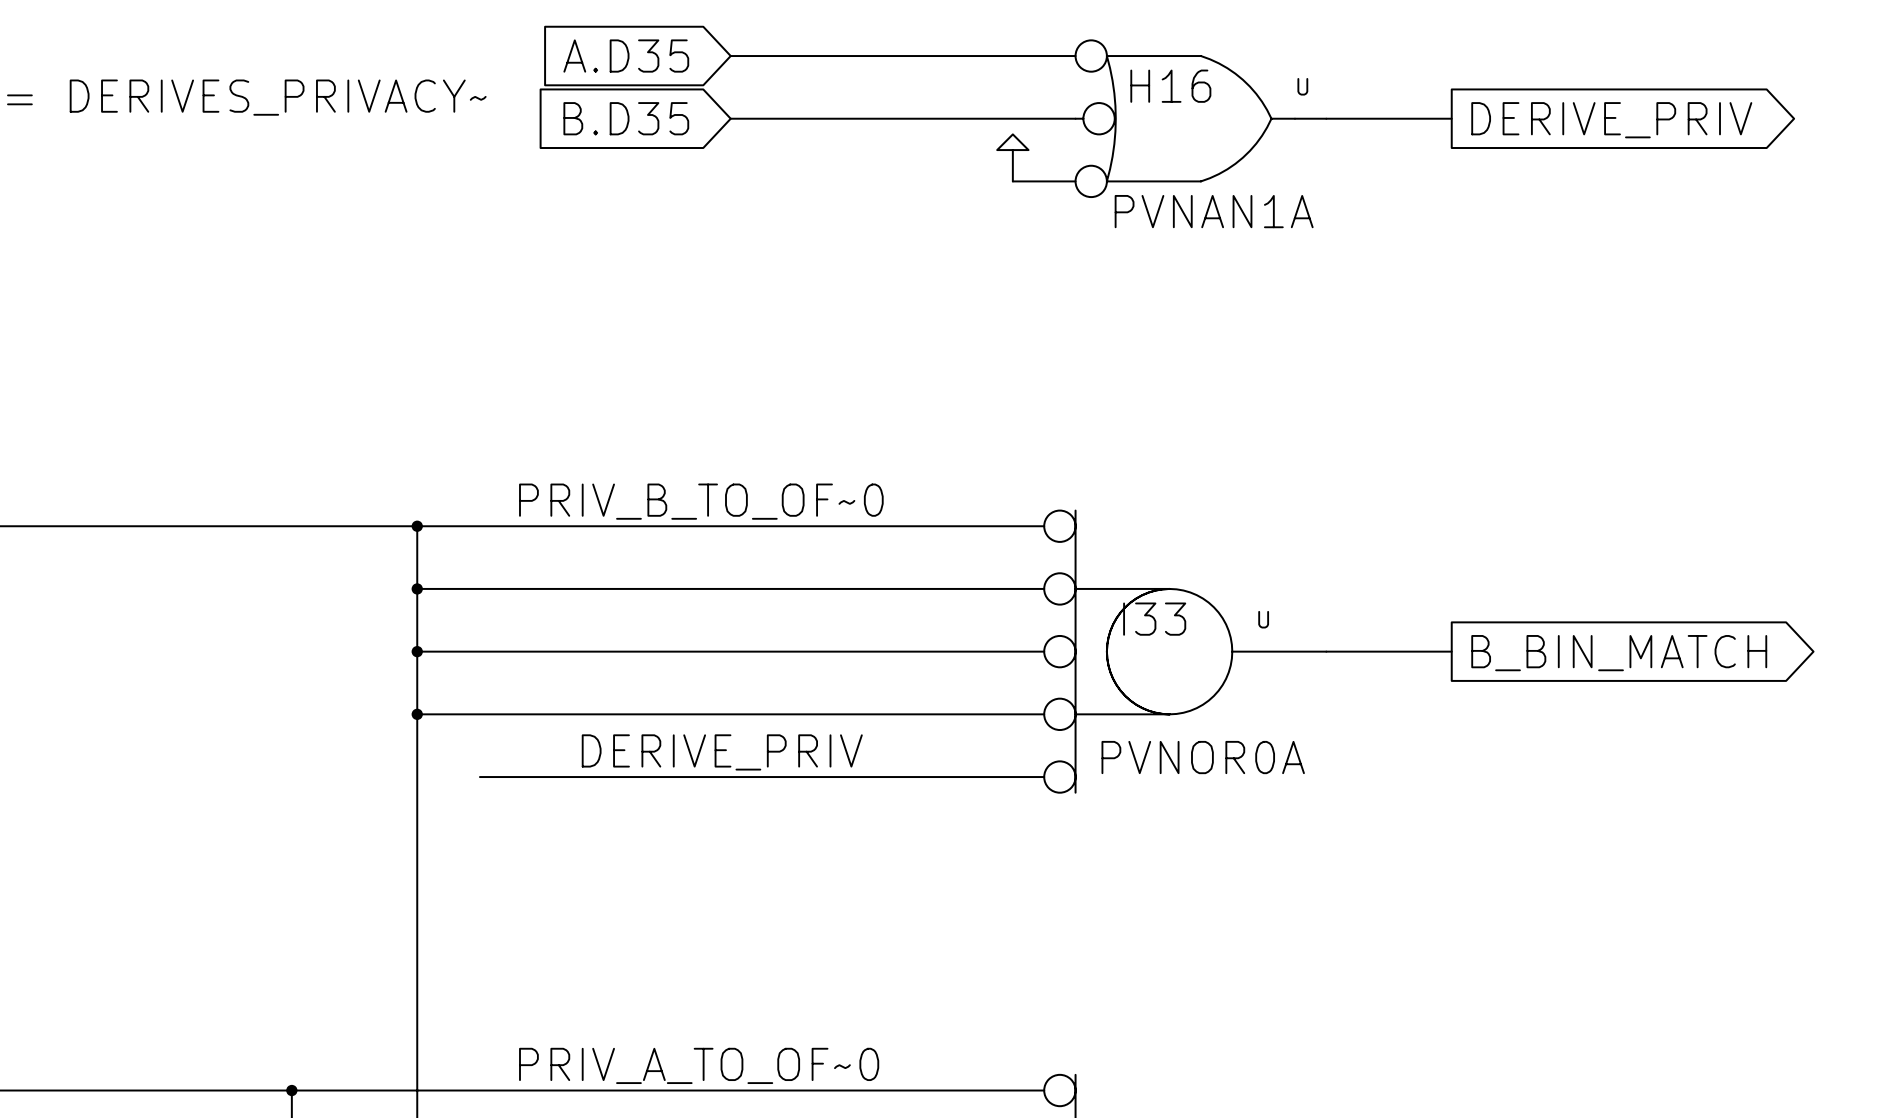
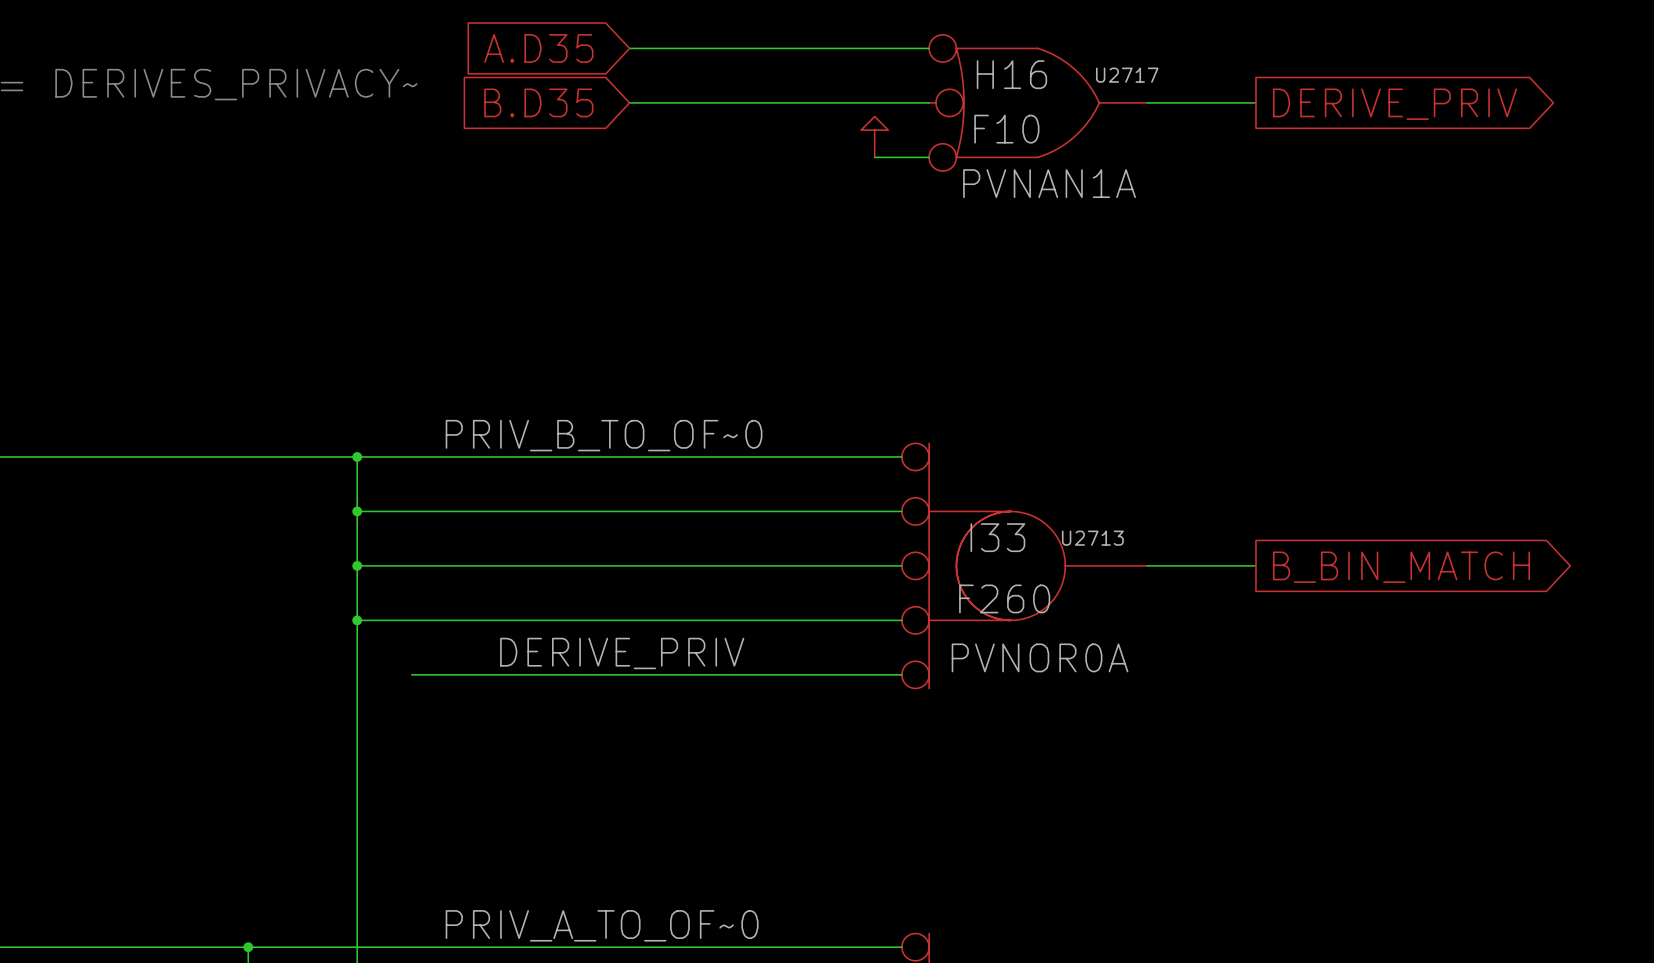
U name: U (1302, 86) -> U2717 (1127, 75)
U value: none -> F10 (1006, 129)
U name: U (1263, 619) -> U2713 (1092, 538)
U value: none -> F260 (1004, 598)

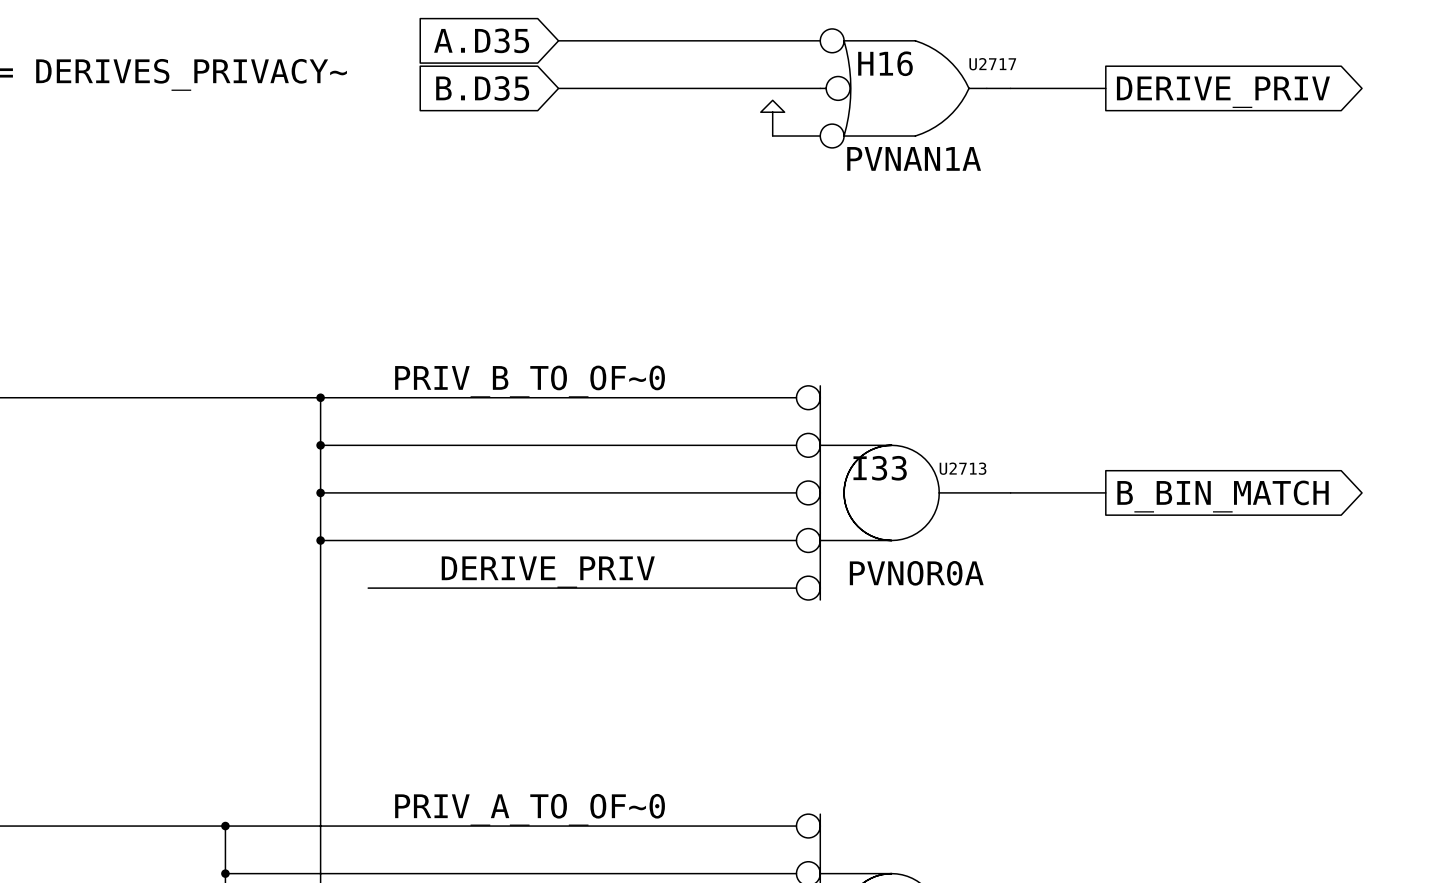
U2717 value: F10 (1006, 129) -> none
U2713 value: F260 (1004, 598) -> none

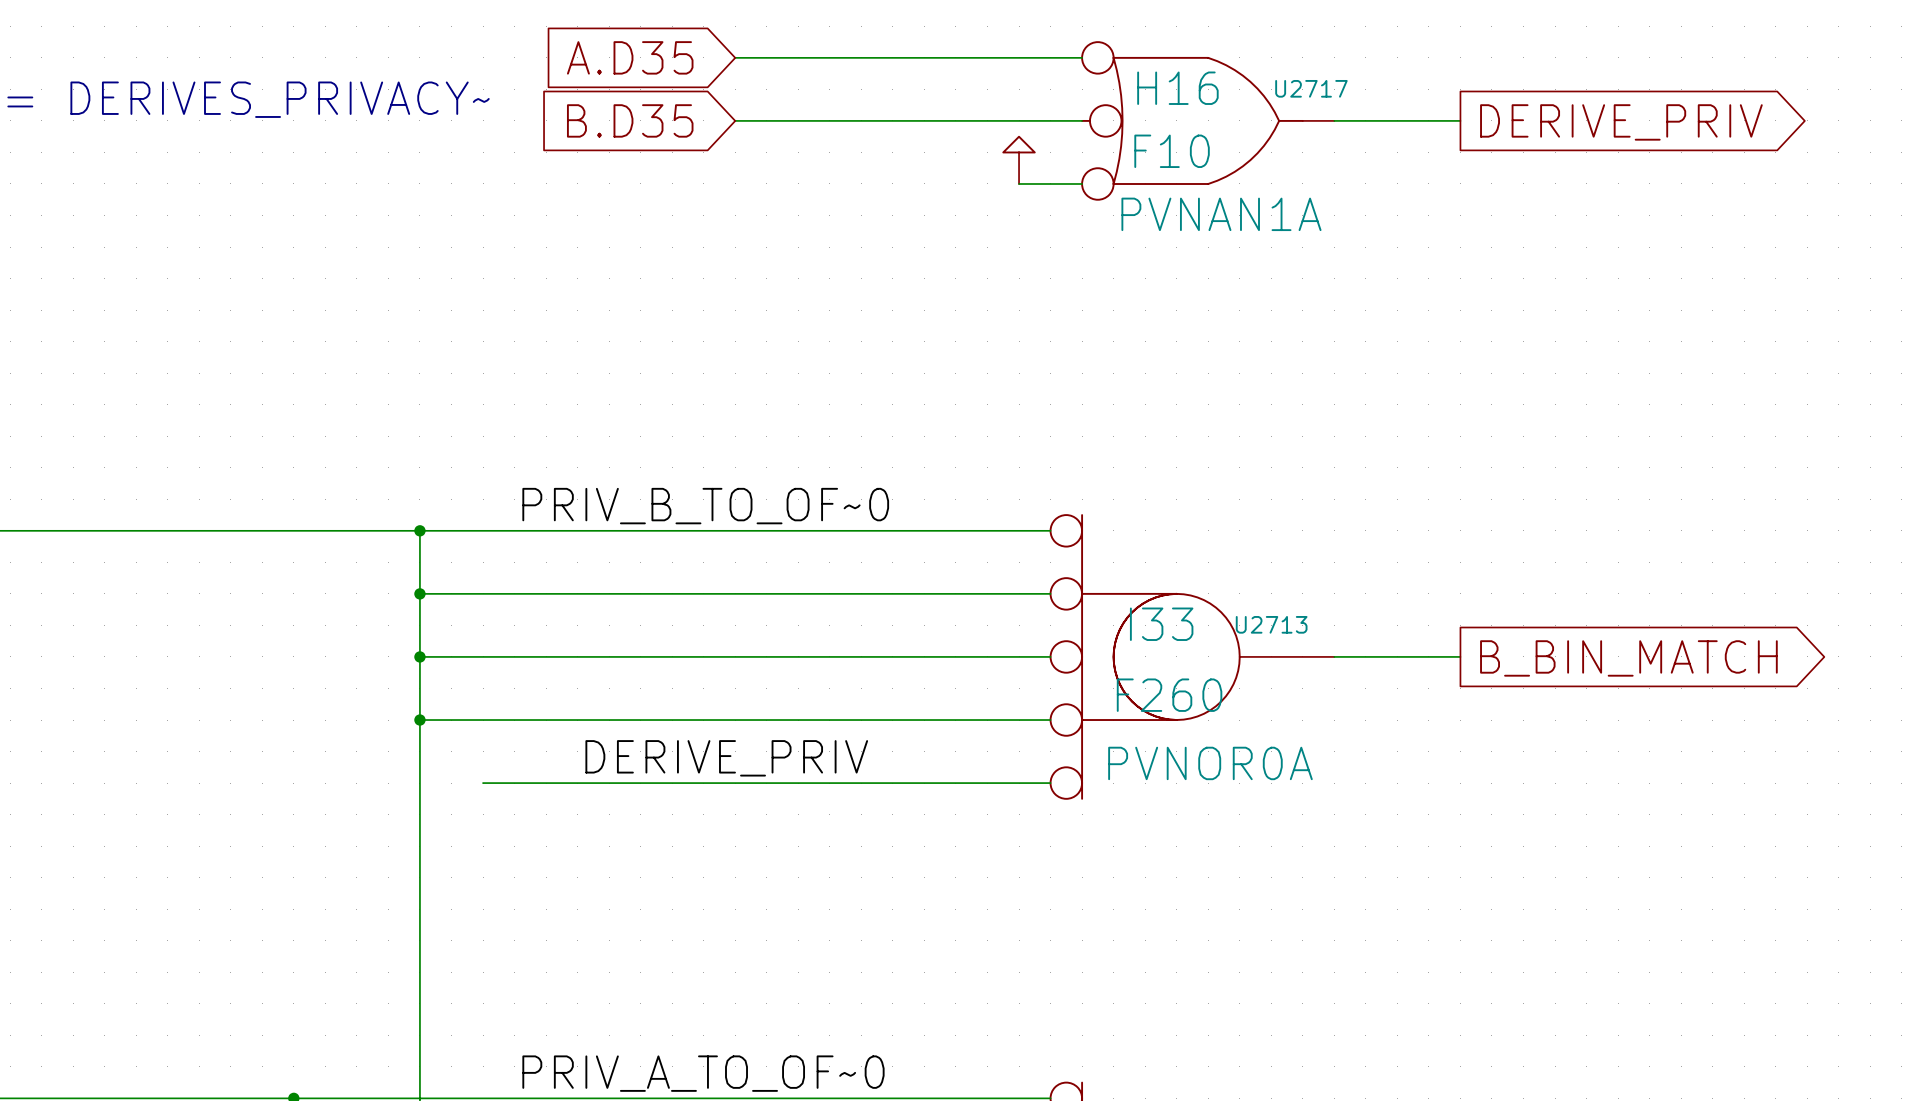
U2717 value: none -> F10 (1172, 151)
U2713 value: none -> F260 (1169, 695)

